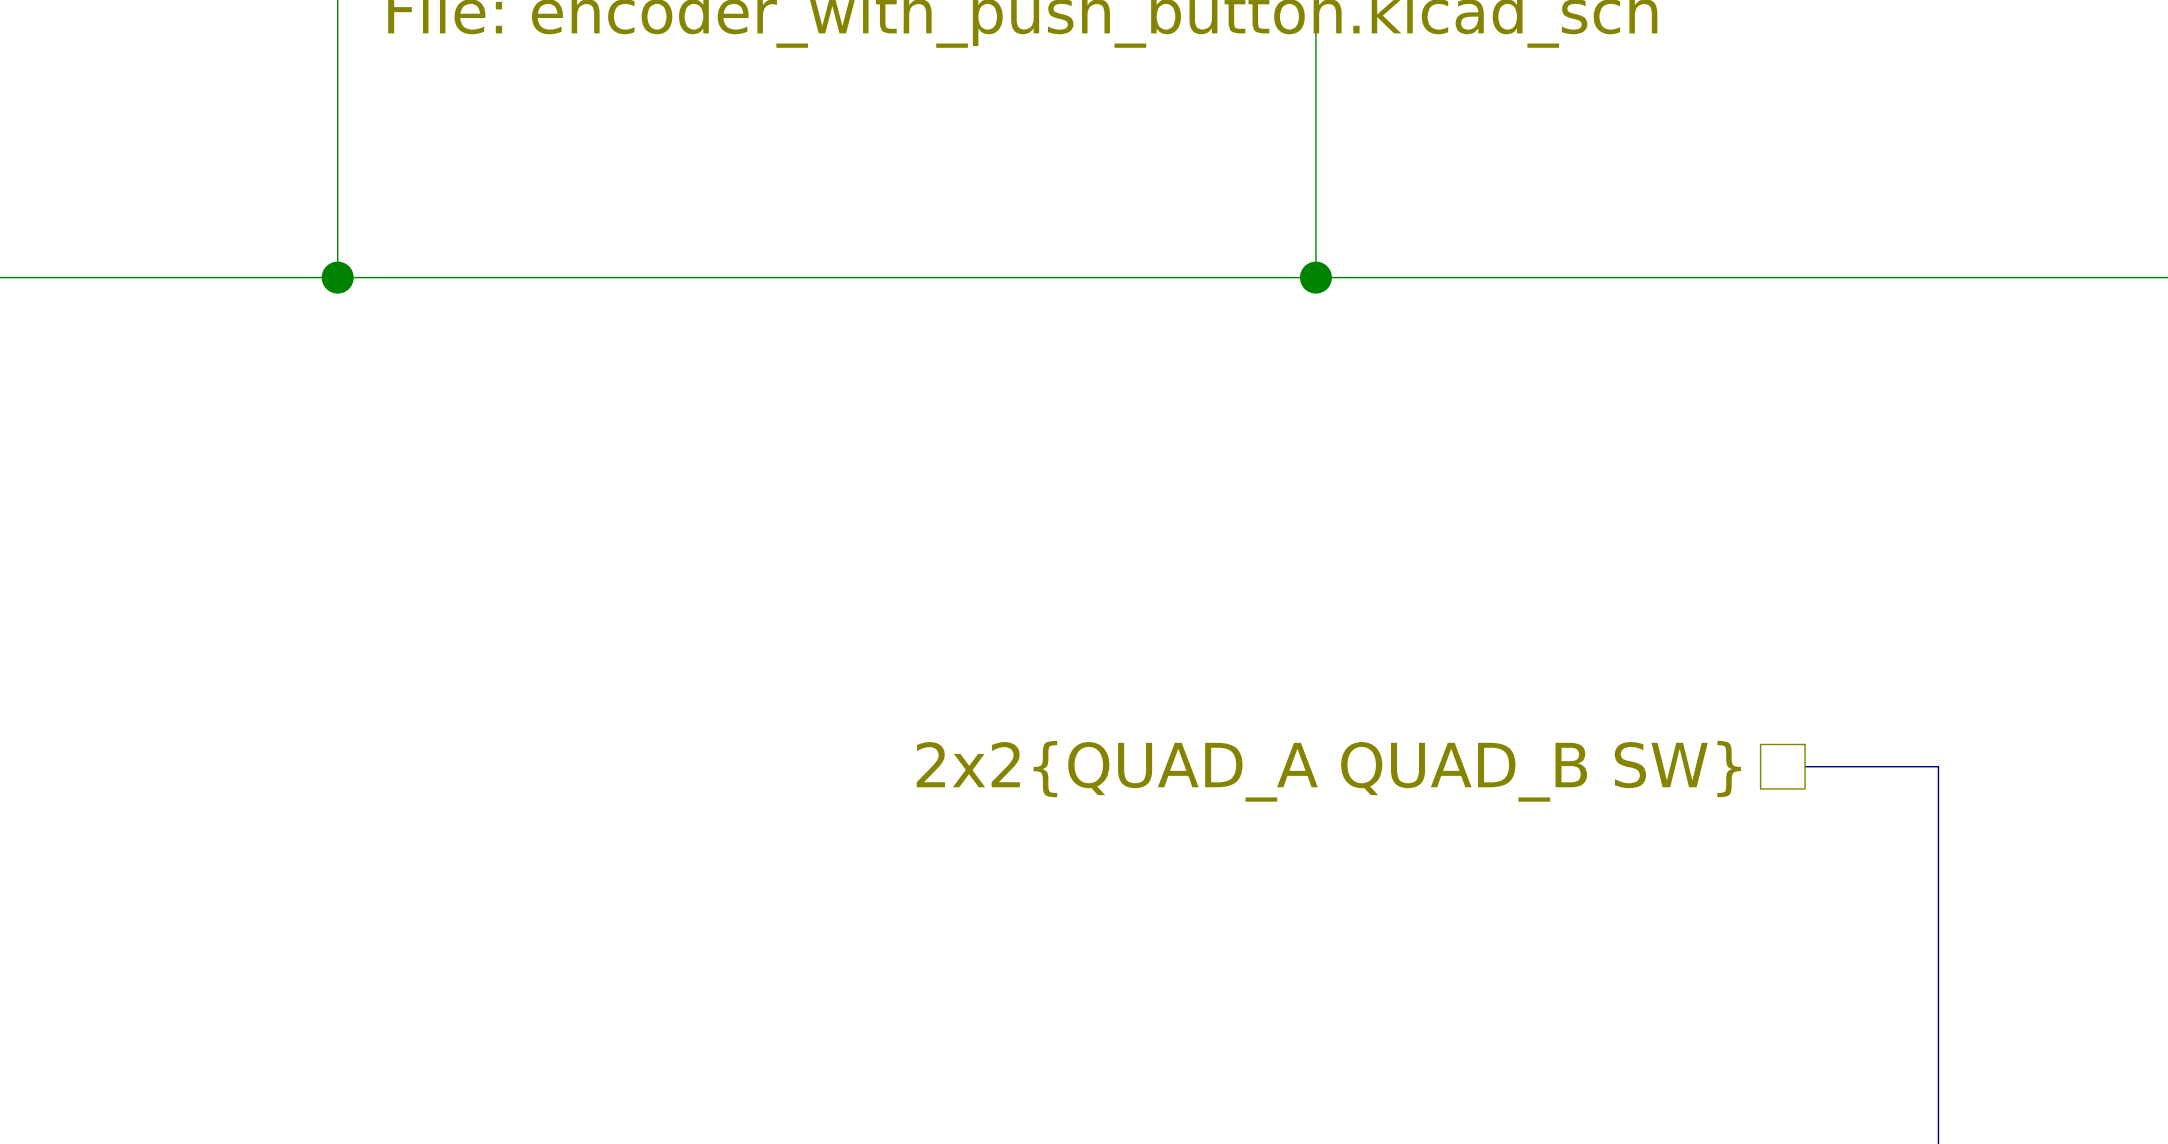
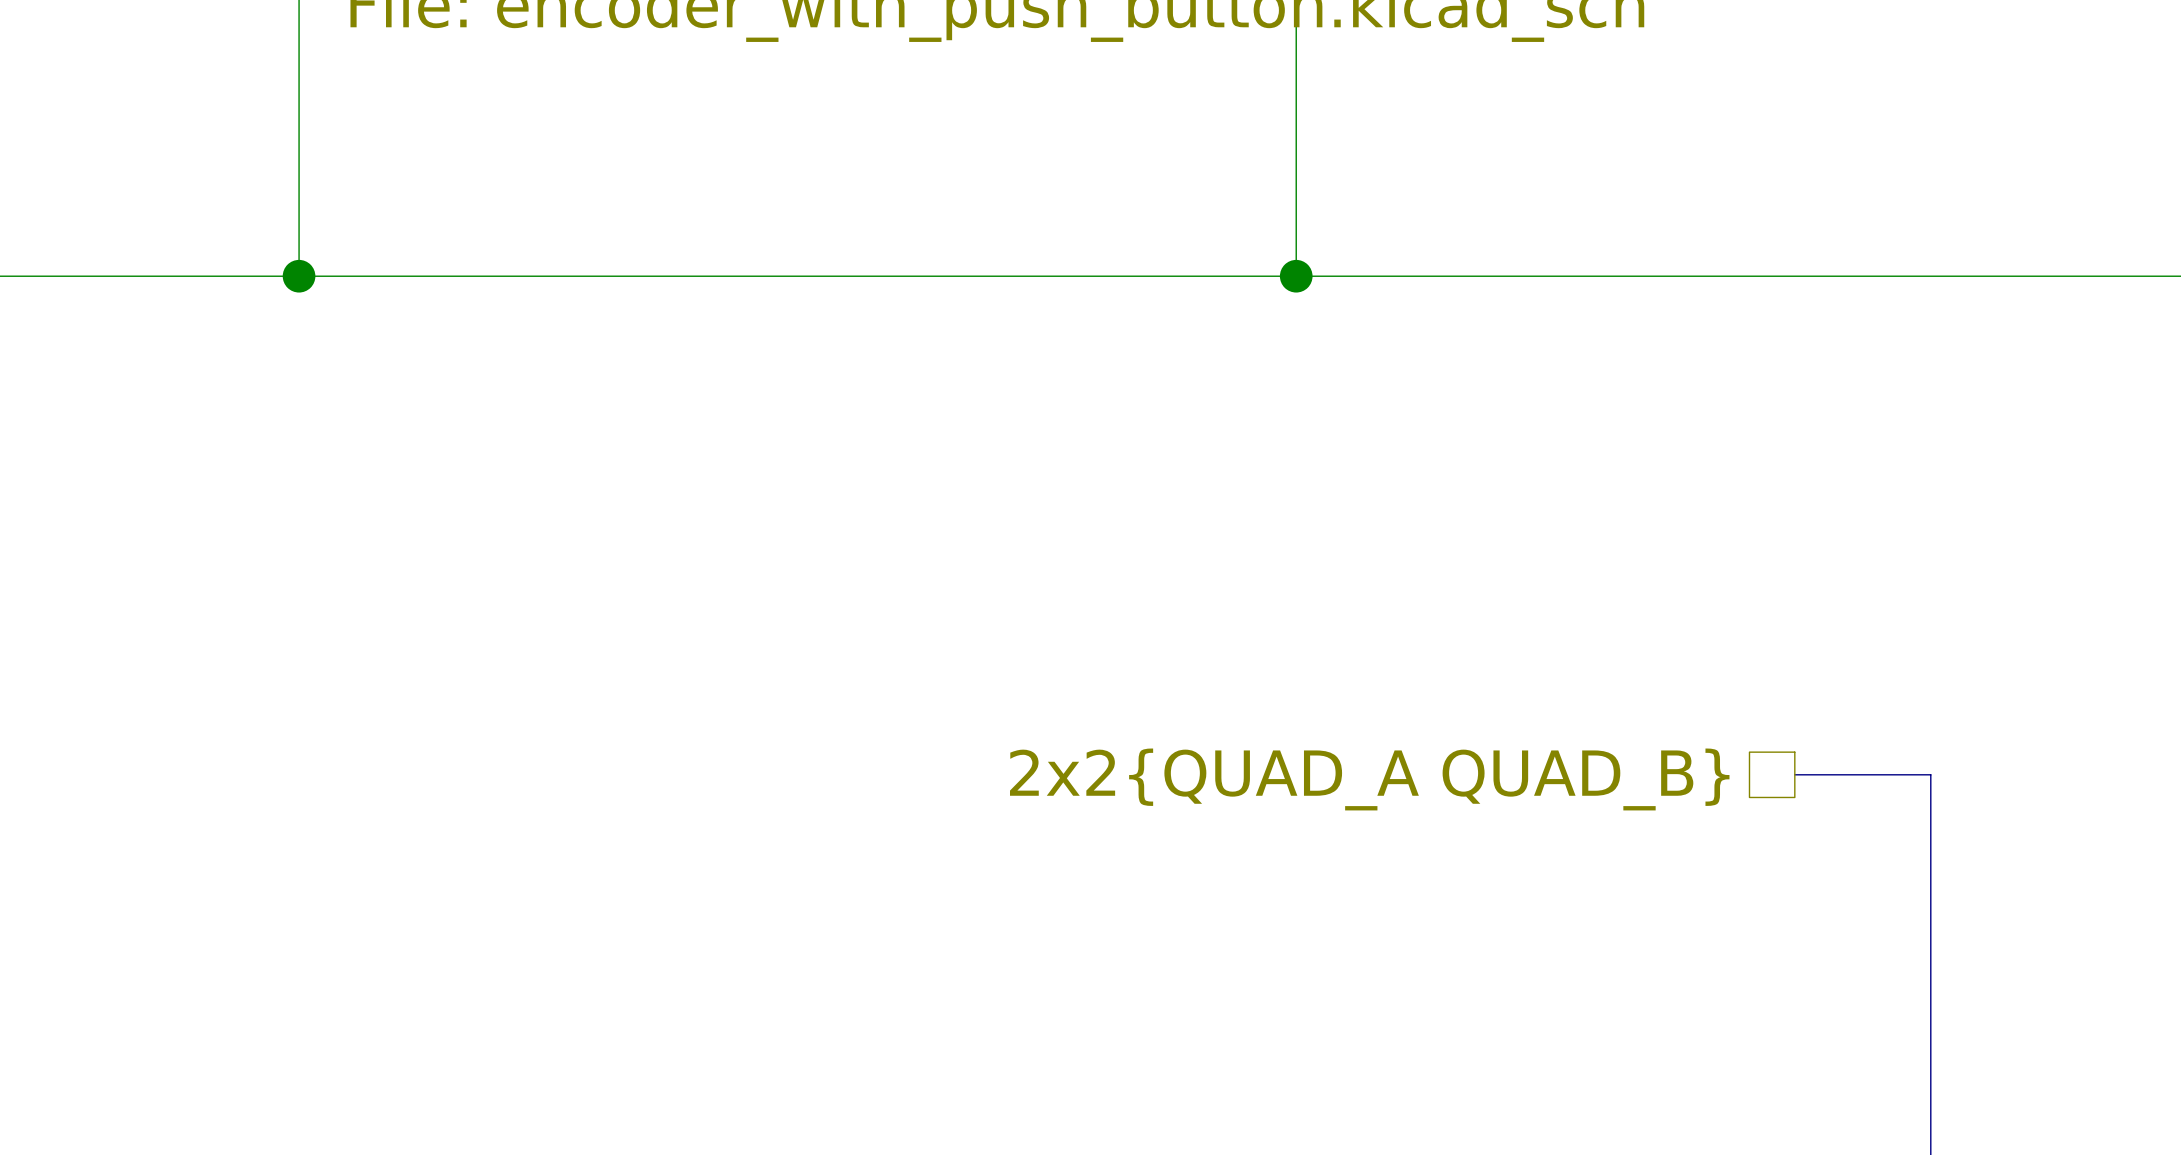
hierarchical label: 2x2{QUAD_A QUAD_B SW} (1328, 771) -> 2x2{QUAD_A QUAD_B} (1369, 779)

